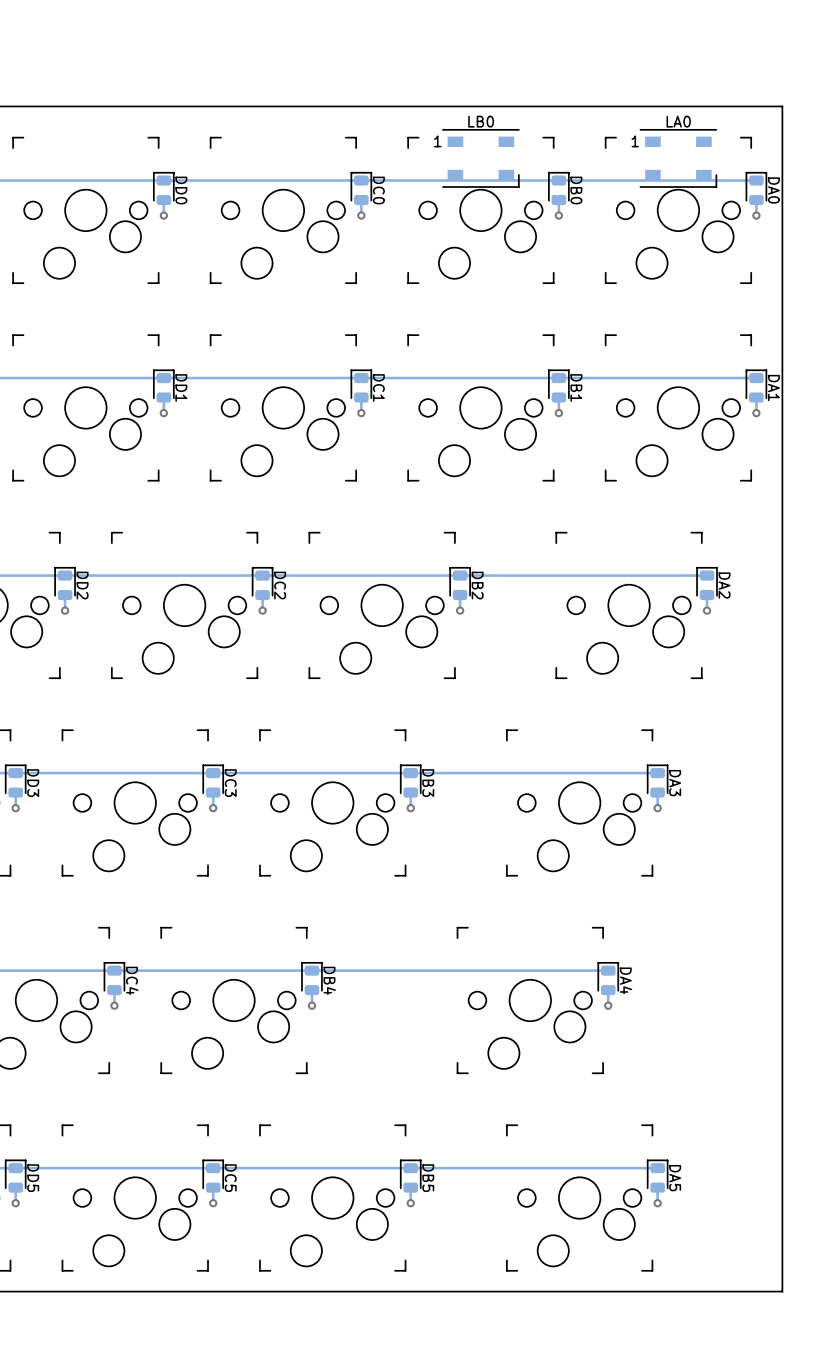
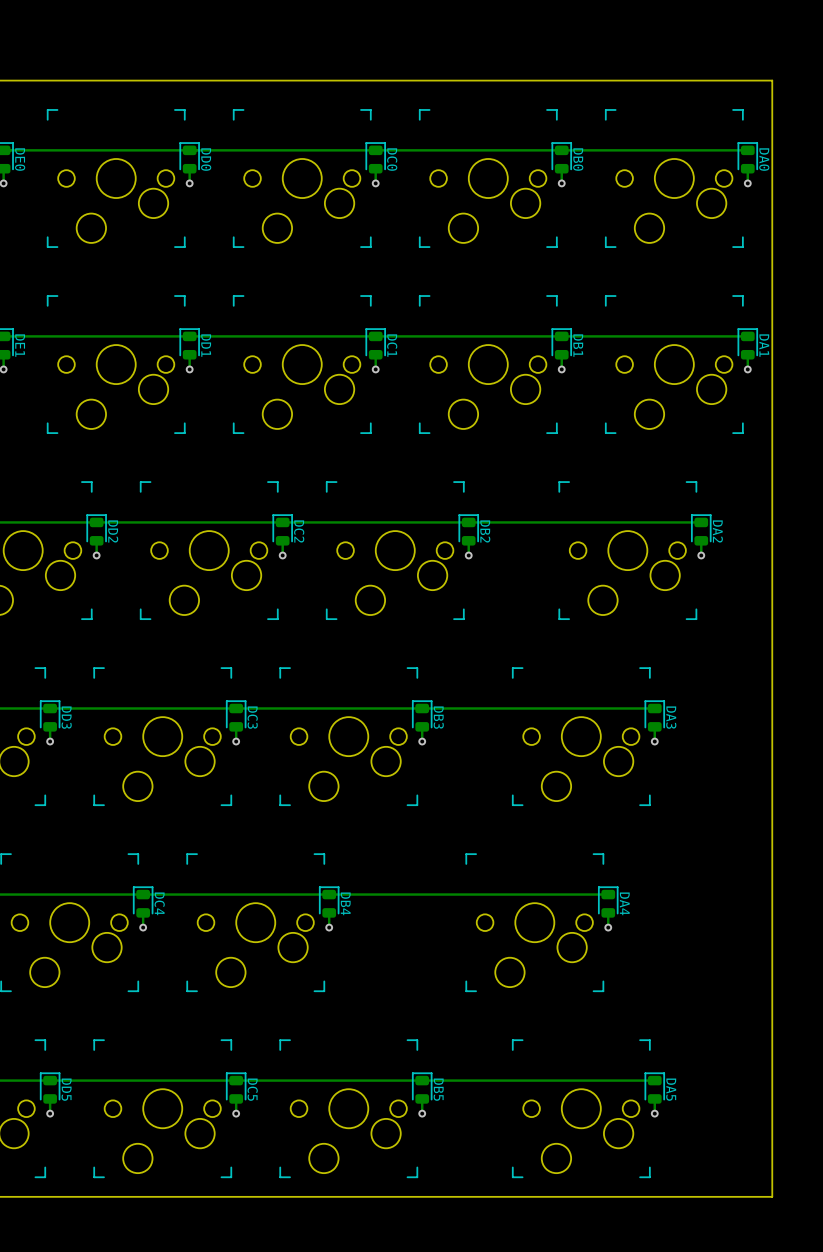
LB0: (480, 158) -> none
LA0: (678, 158) -> none

